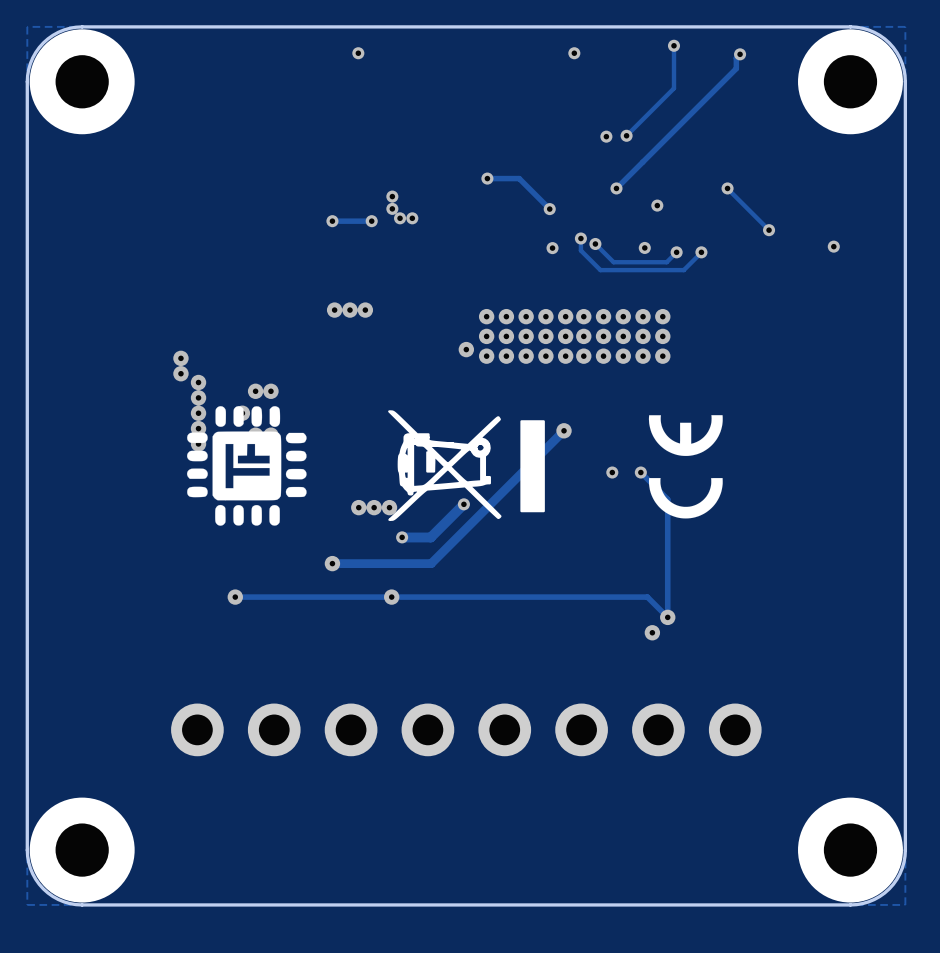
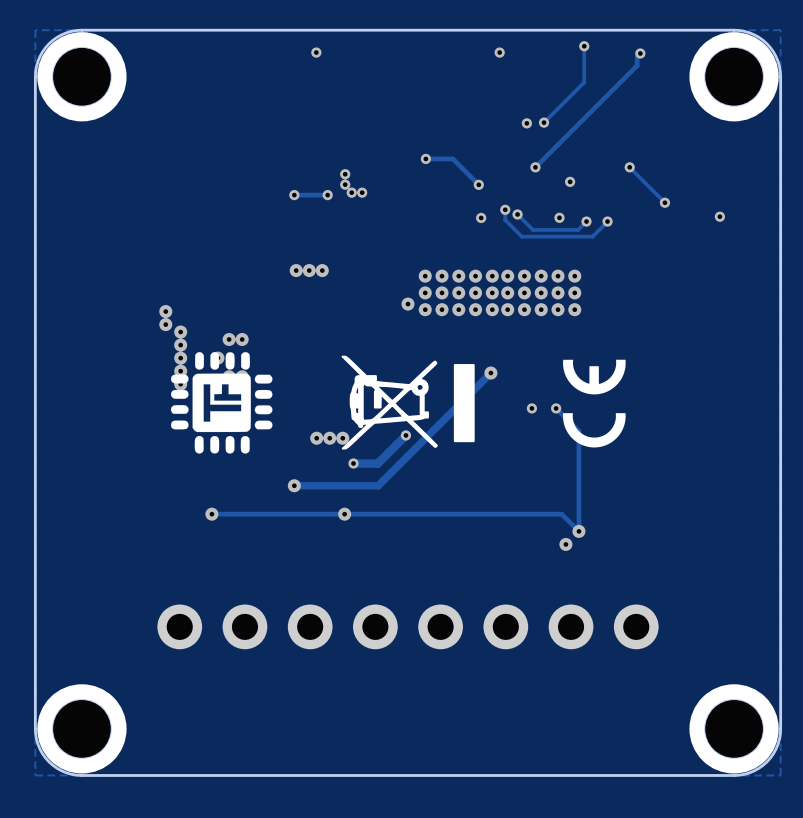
part footprint: [29, 29, 135, 135] -> [37, 32, 127, 122]
part footprint: [798, 29, 903, 135] -> [689, 32, 779, 122]
part footprint: [29, 797, 135, 903] -> [37, 684, 127, 774]
part footprint: [798, 797, 903, 903] -> [689, 684, 779, 774]

